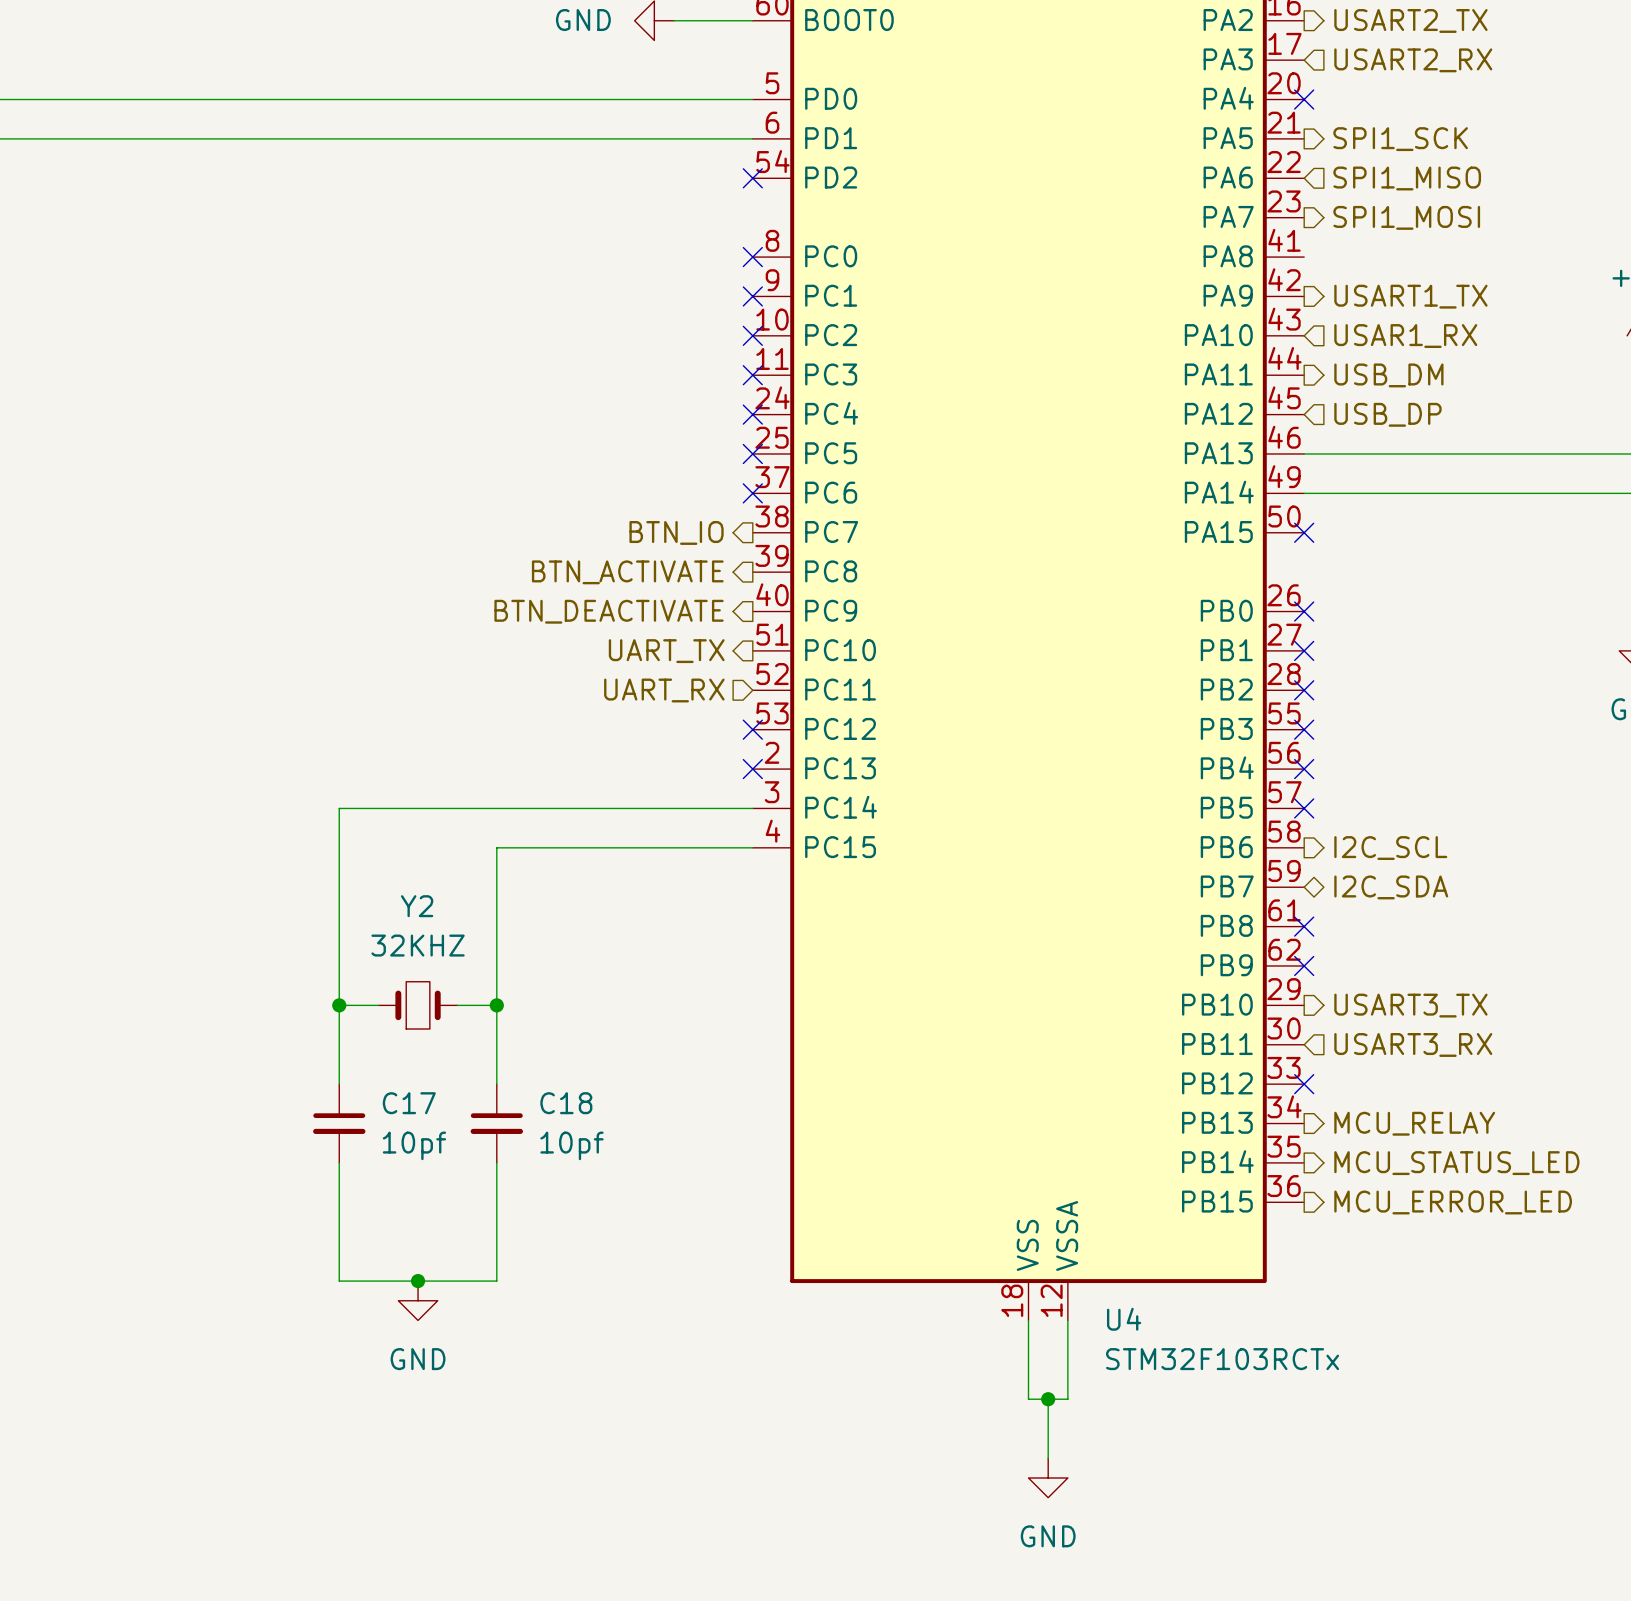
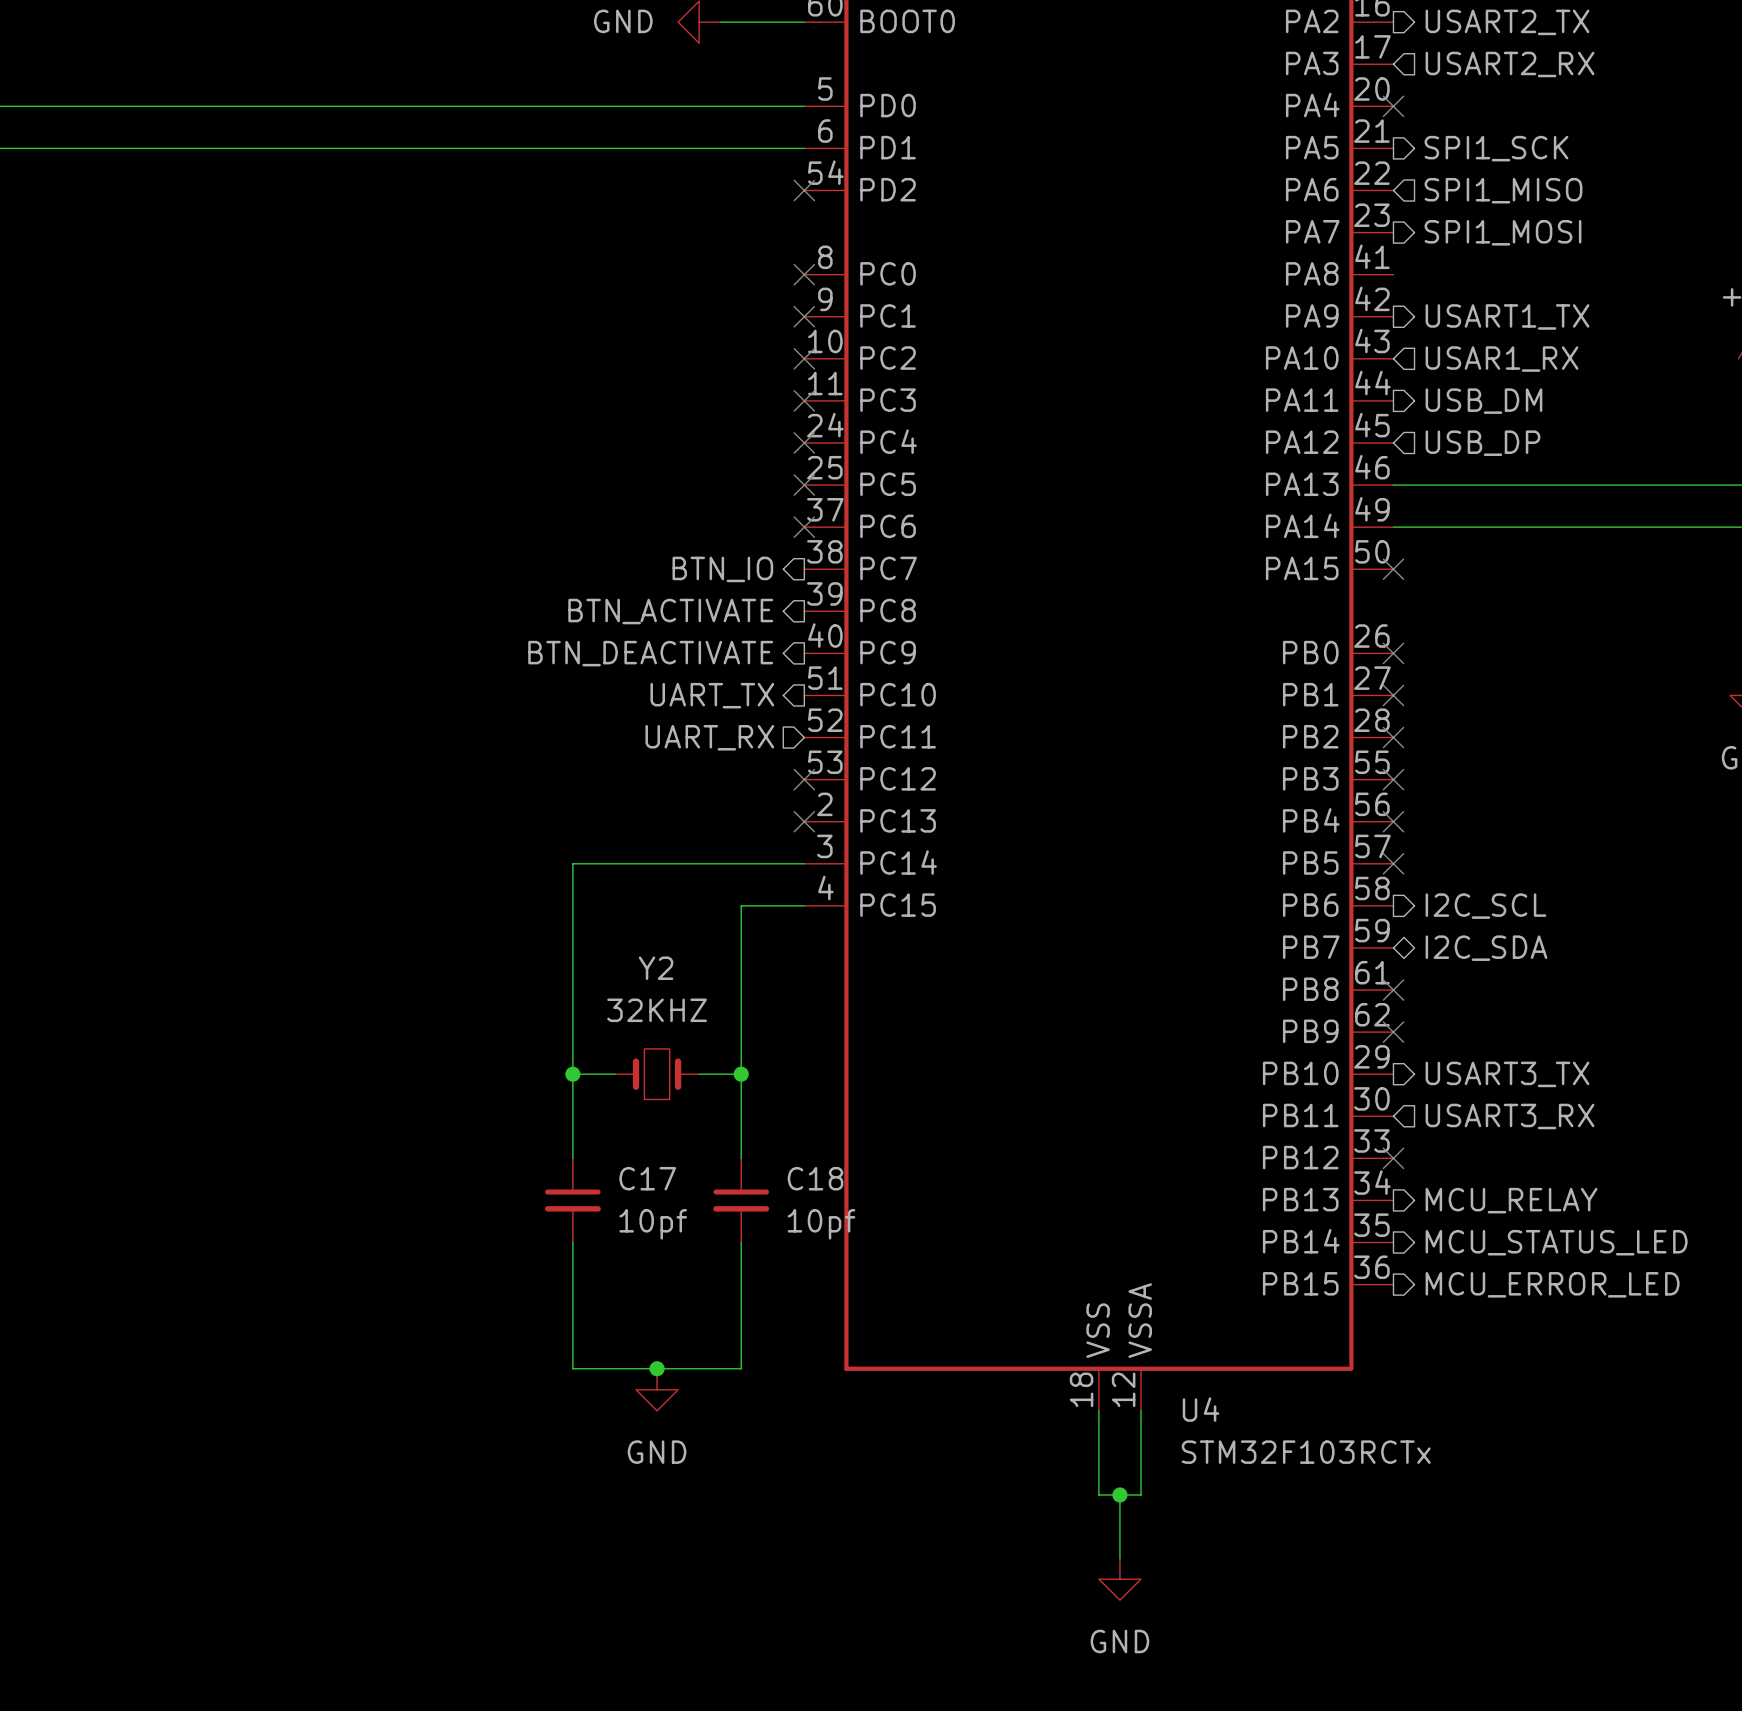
wire: (536, 808) (339, 808) (339, 1084) -> (572, 863) (572, 1158)
wire: (693, 847) (496, 847) (496, 1084) -> (741, 905) (741, 1158)
wire: (339, 1005) (378, 1005) -> (572, 1074) (614, 1074)
junction: (339, 1005) -> none
Y2 position: (418, 1005) -> (657, 1074)
wire: (457, 1005) (496, 1005) -> (699, 1074) (741, 1074)
junction position: (496, 1005) -> (572, 1074)
junction: none -> (741, 1074)
C17 position: (339, 1123) -> (572, 1200)
C18 position: (496, 1123) -> (741, 1200)
wire: (339, 1162) (339, 1281) (496, 1281) (496, 1162) -> (572, 1242) (572, 1368) (741, 1368) (741, 1242)
junction: (418, 1281) -> none
junction: none -> (657, 1368)
power symbol position: GND (418, 1300) -> GND (657, 1389)

